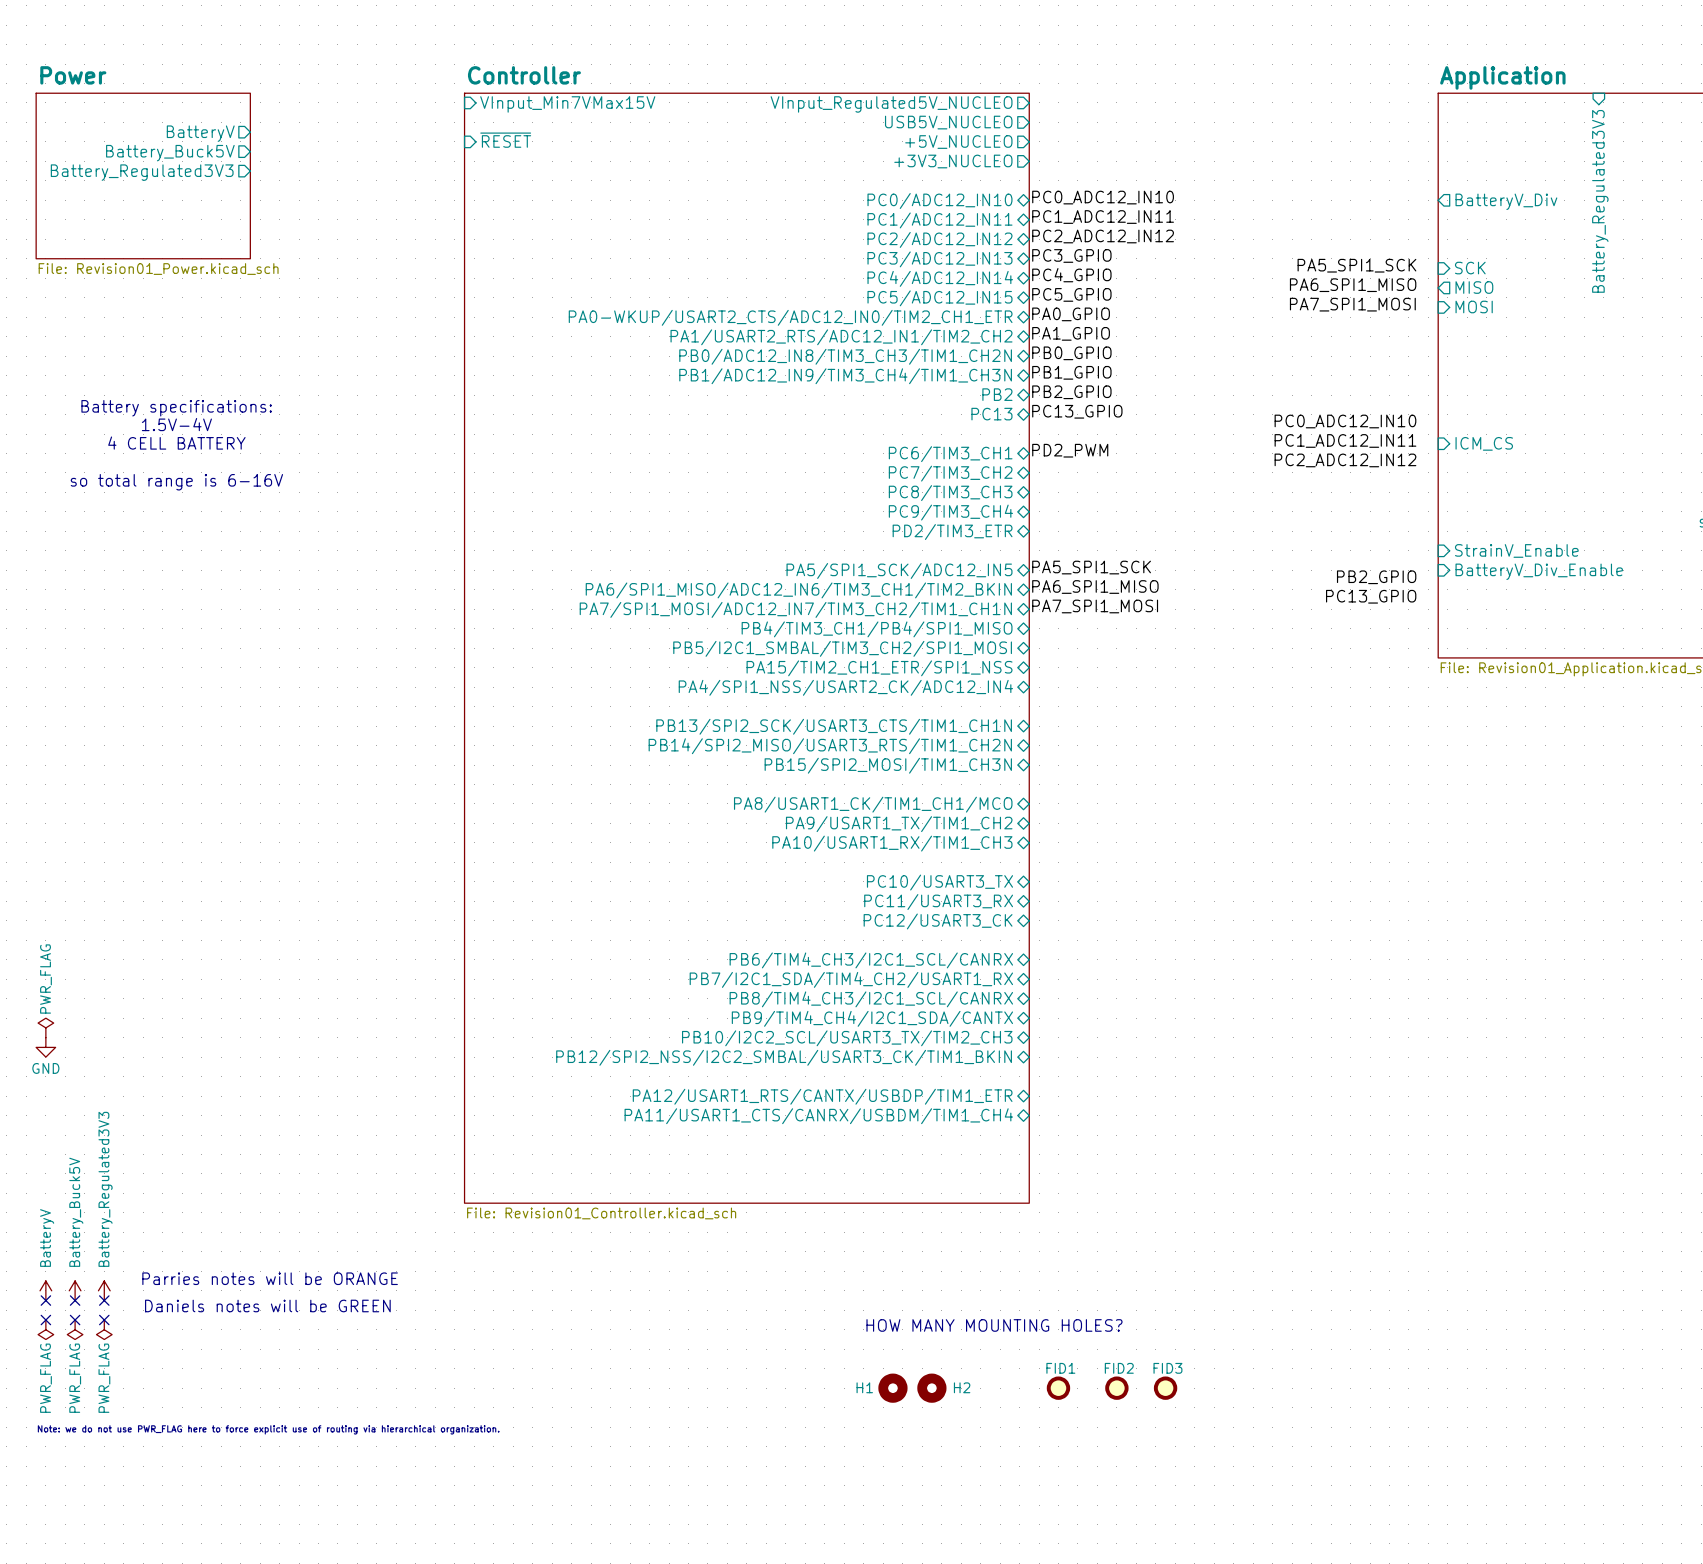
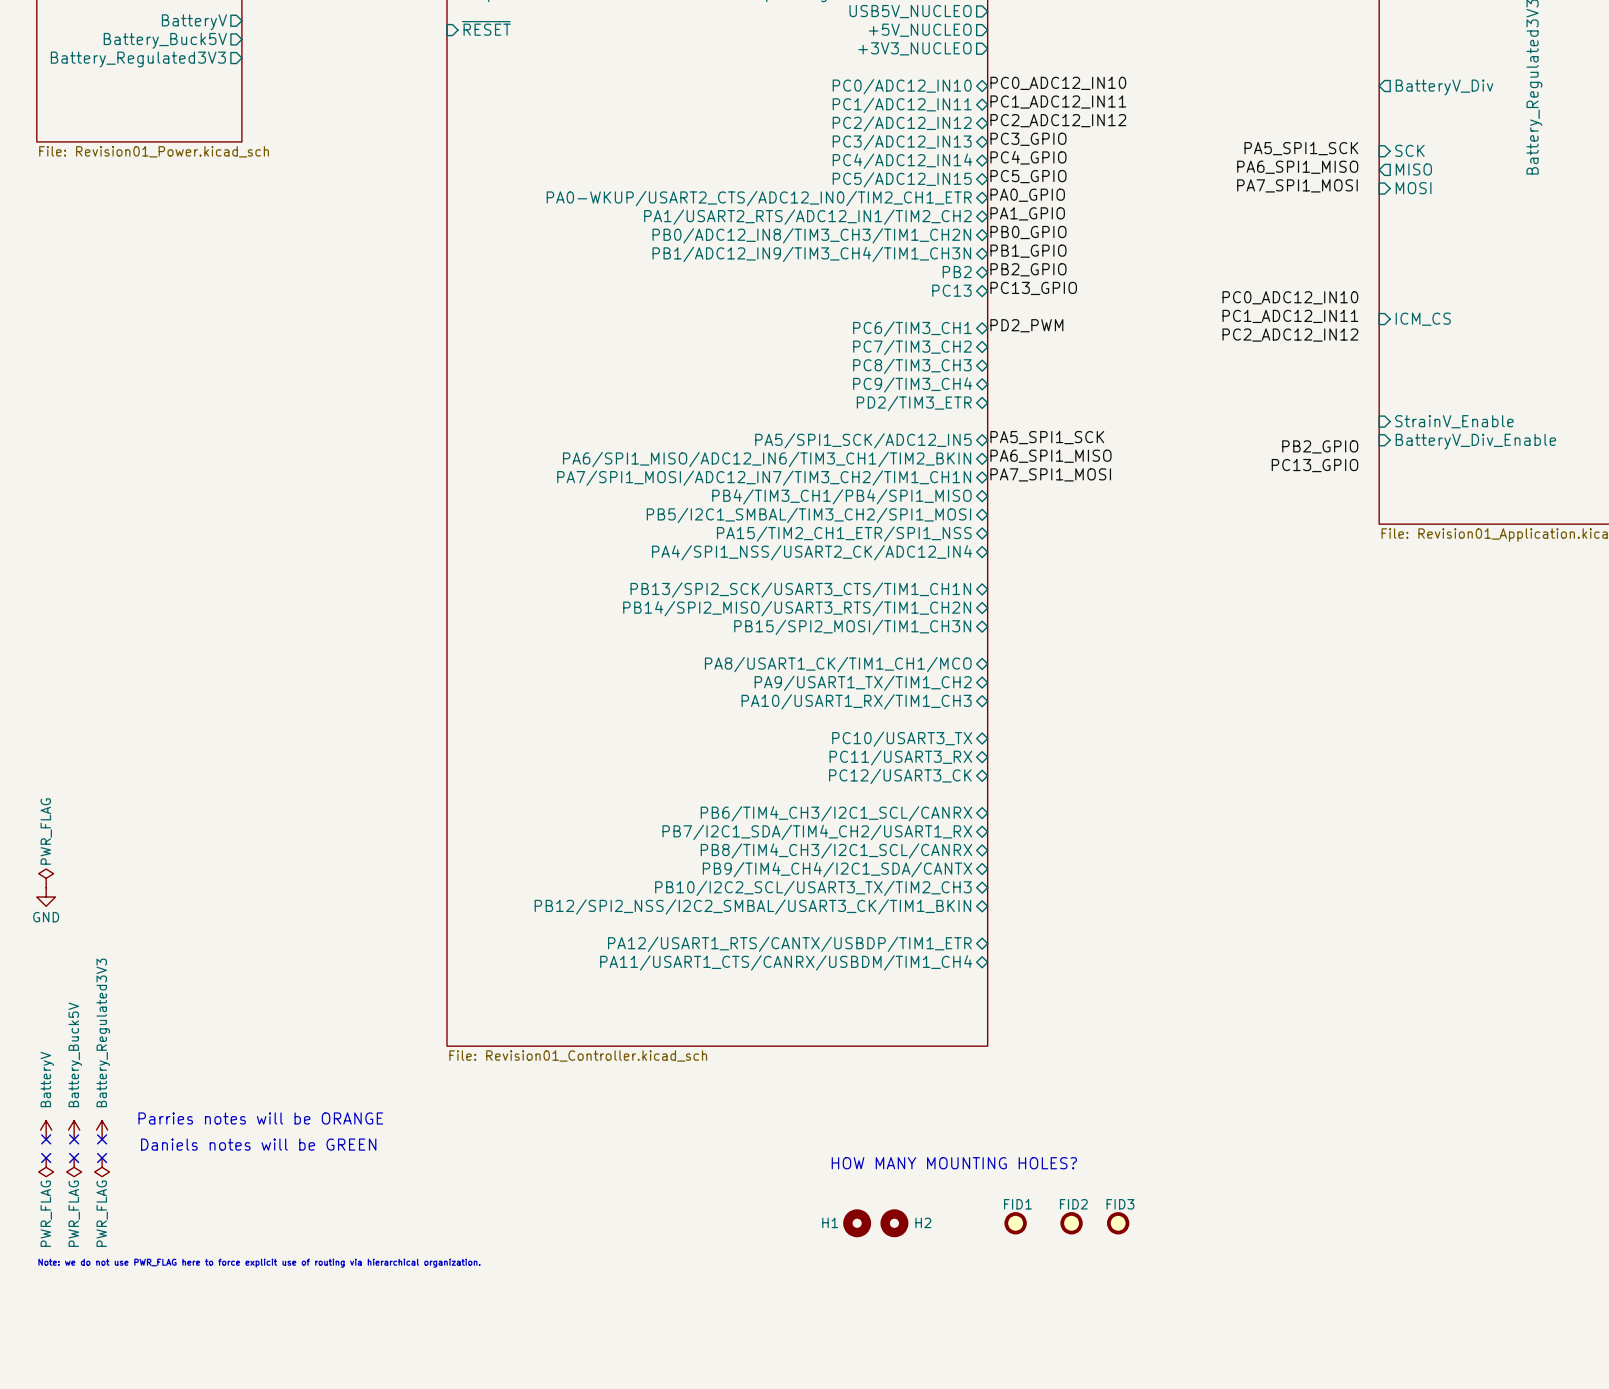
text: Battery specifications: (176, 408) -> none
text: 1.5V-4V (176, 424) -> none
text: 4 CELL BATTERY (176, 443) -> none
text: so total range is 6-16V (176, 482) -> none

